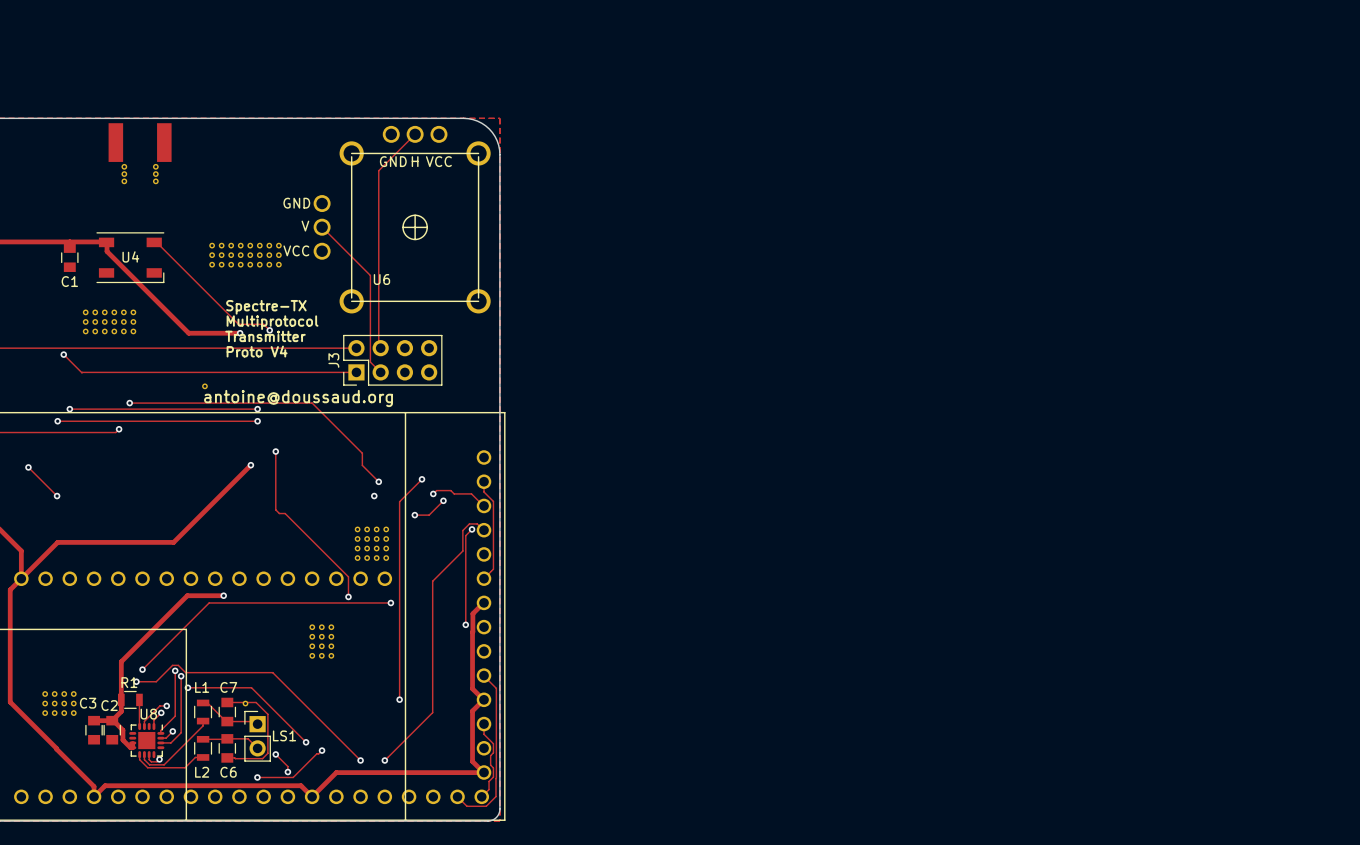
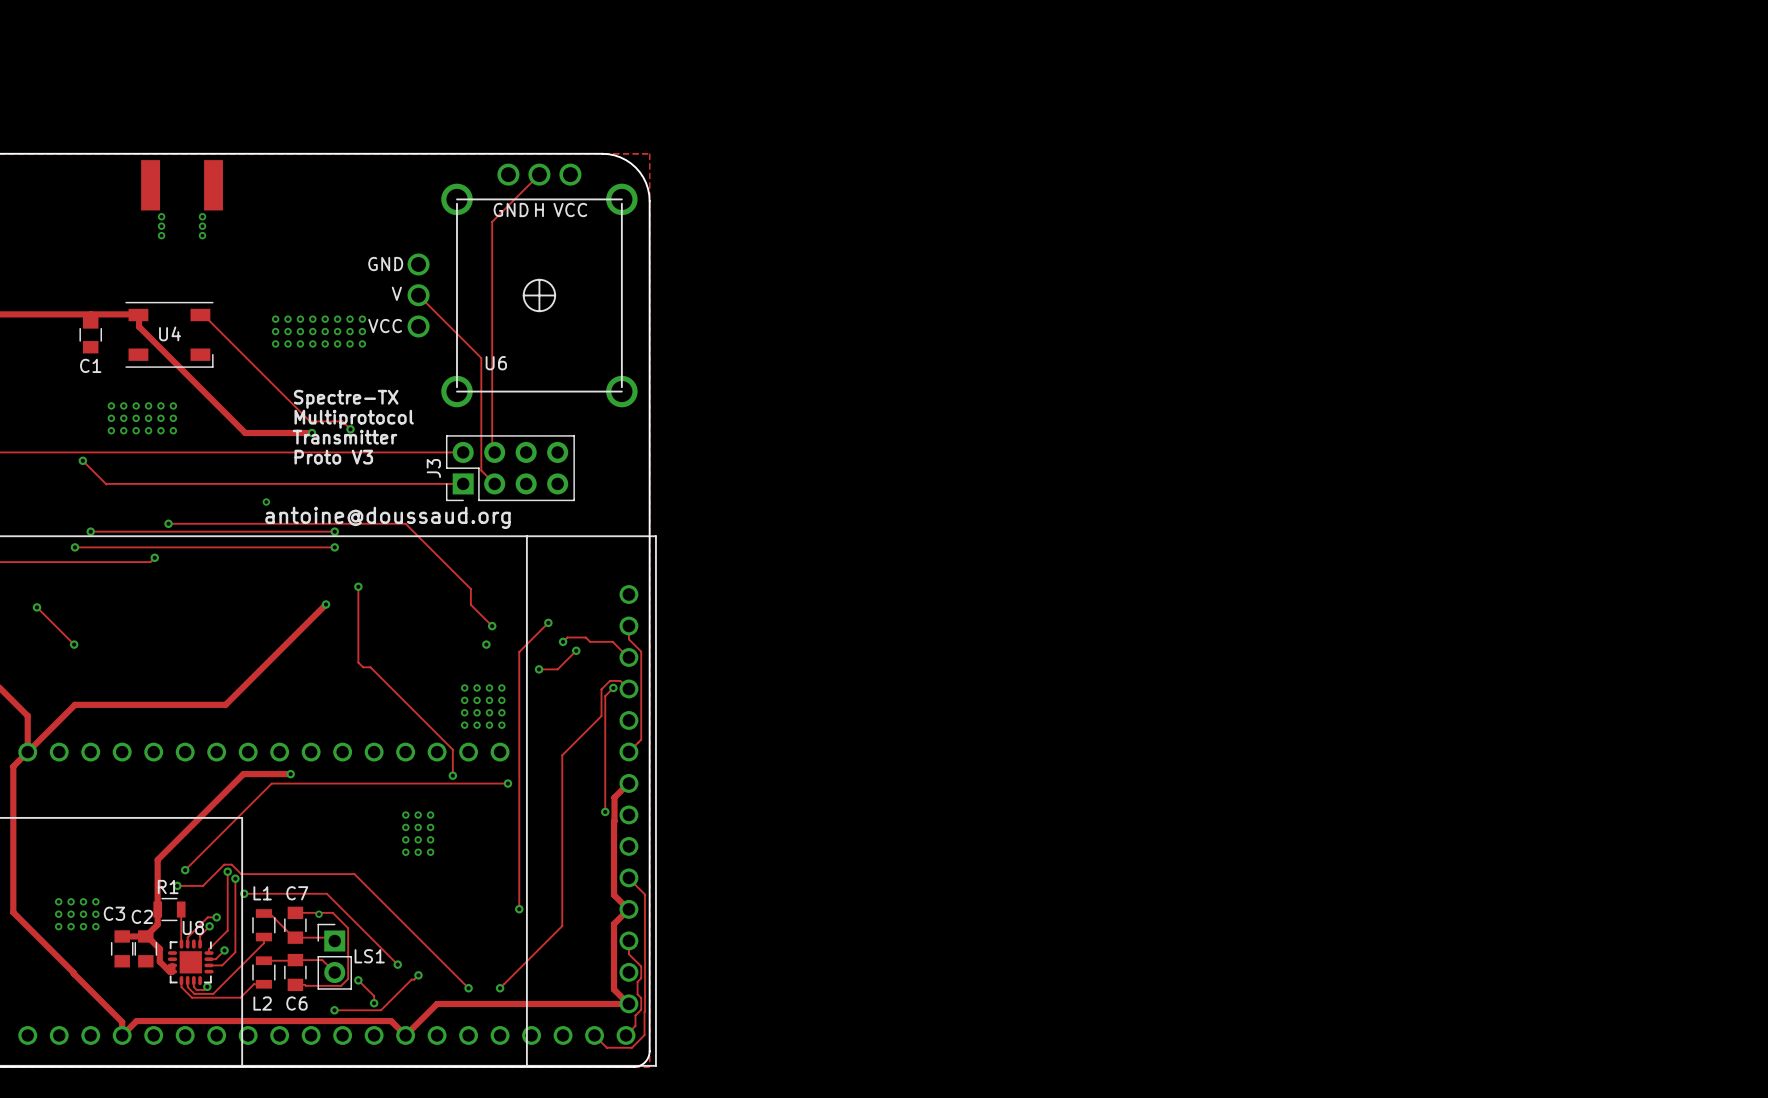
text: Proto V4 (257, 351) -> Proto V3 (333, 457)

